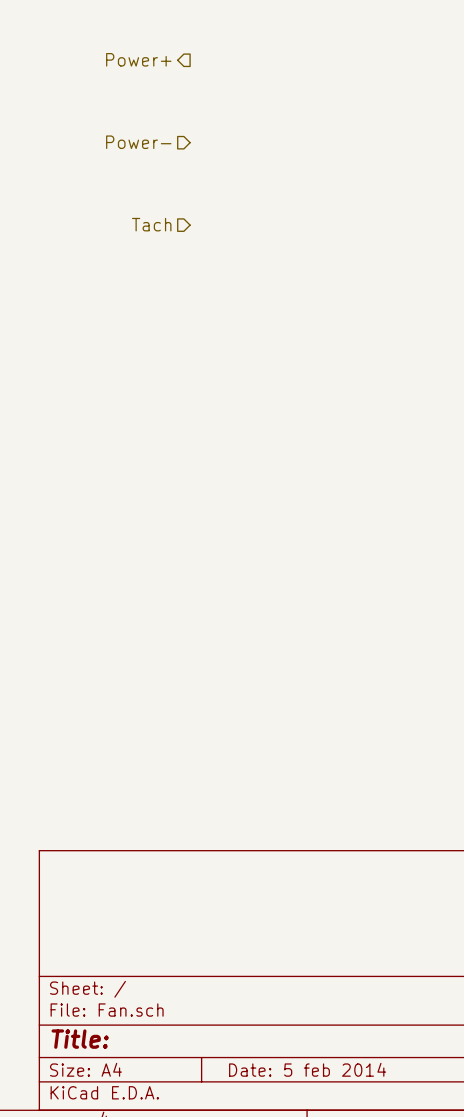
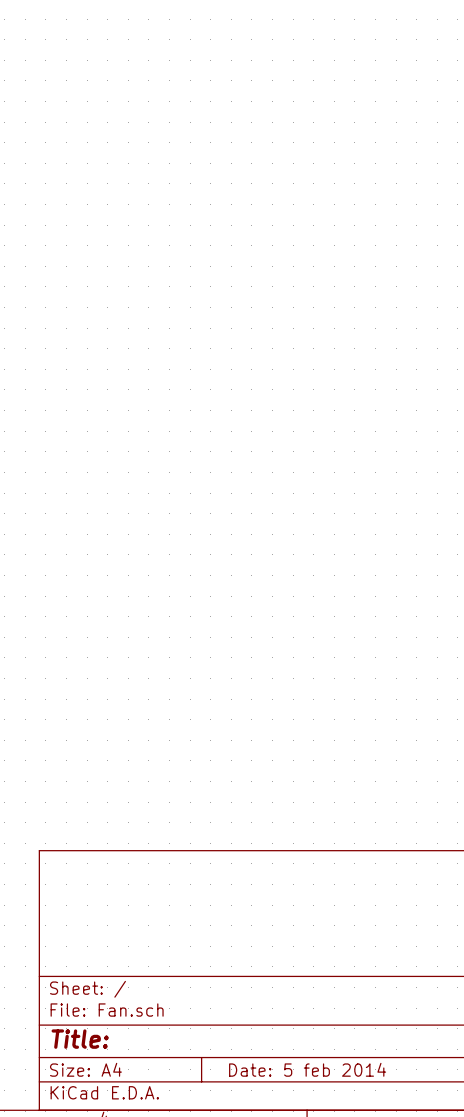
hierarchical label: Power+ (138, 59) -> none
hierarchical label: Power- (138, 142) -> none
hierarchical label: Tach (151, 224) -> none

